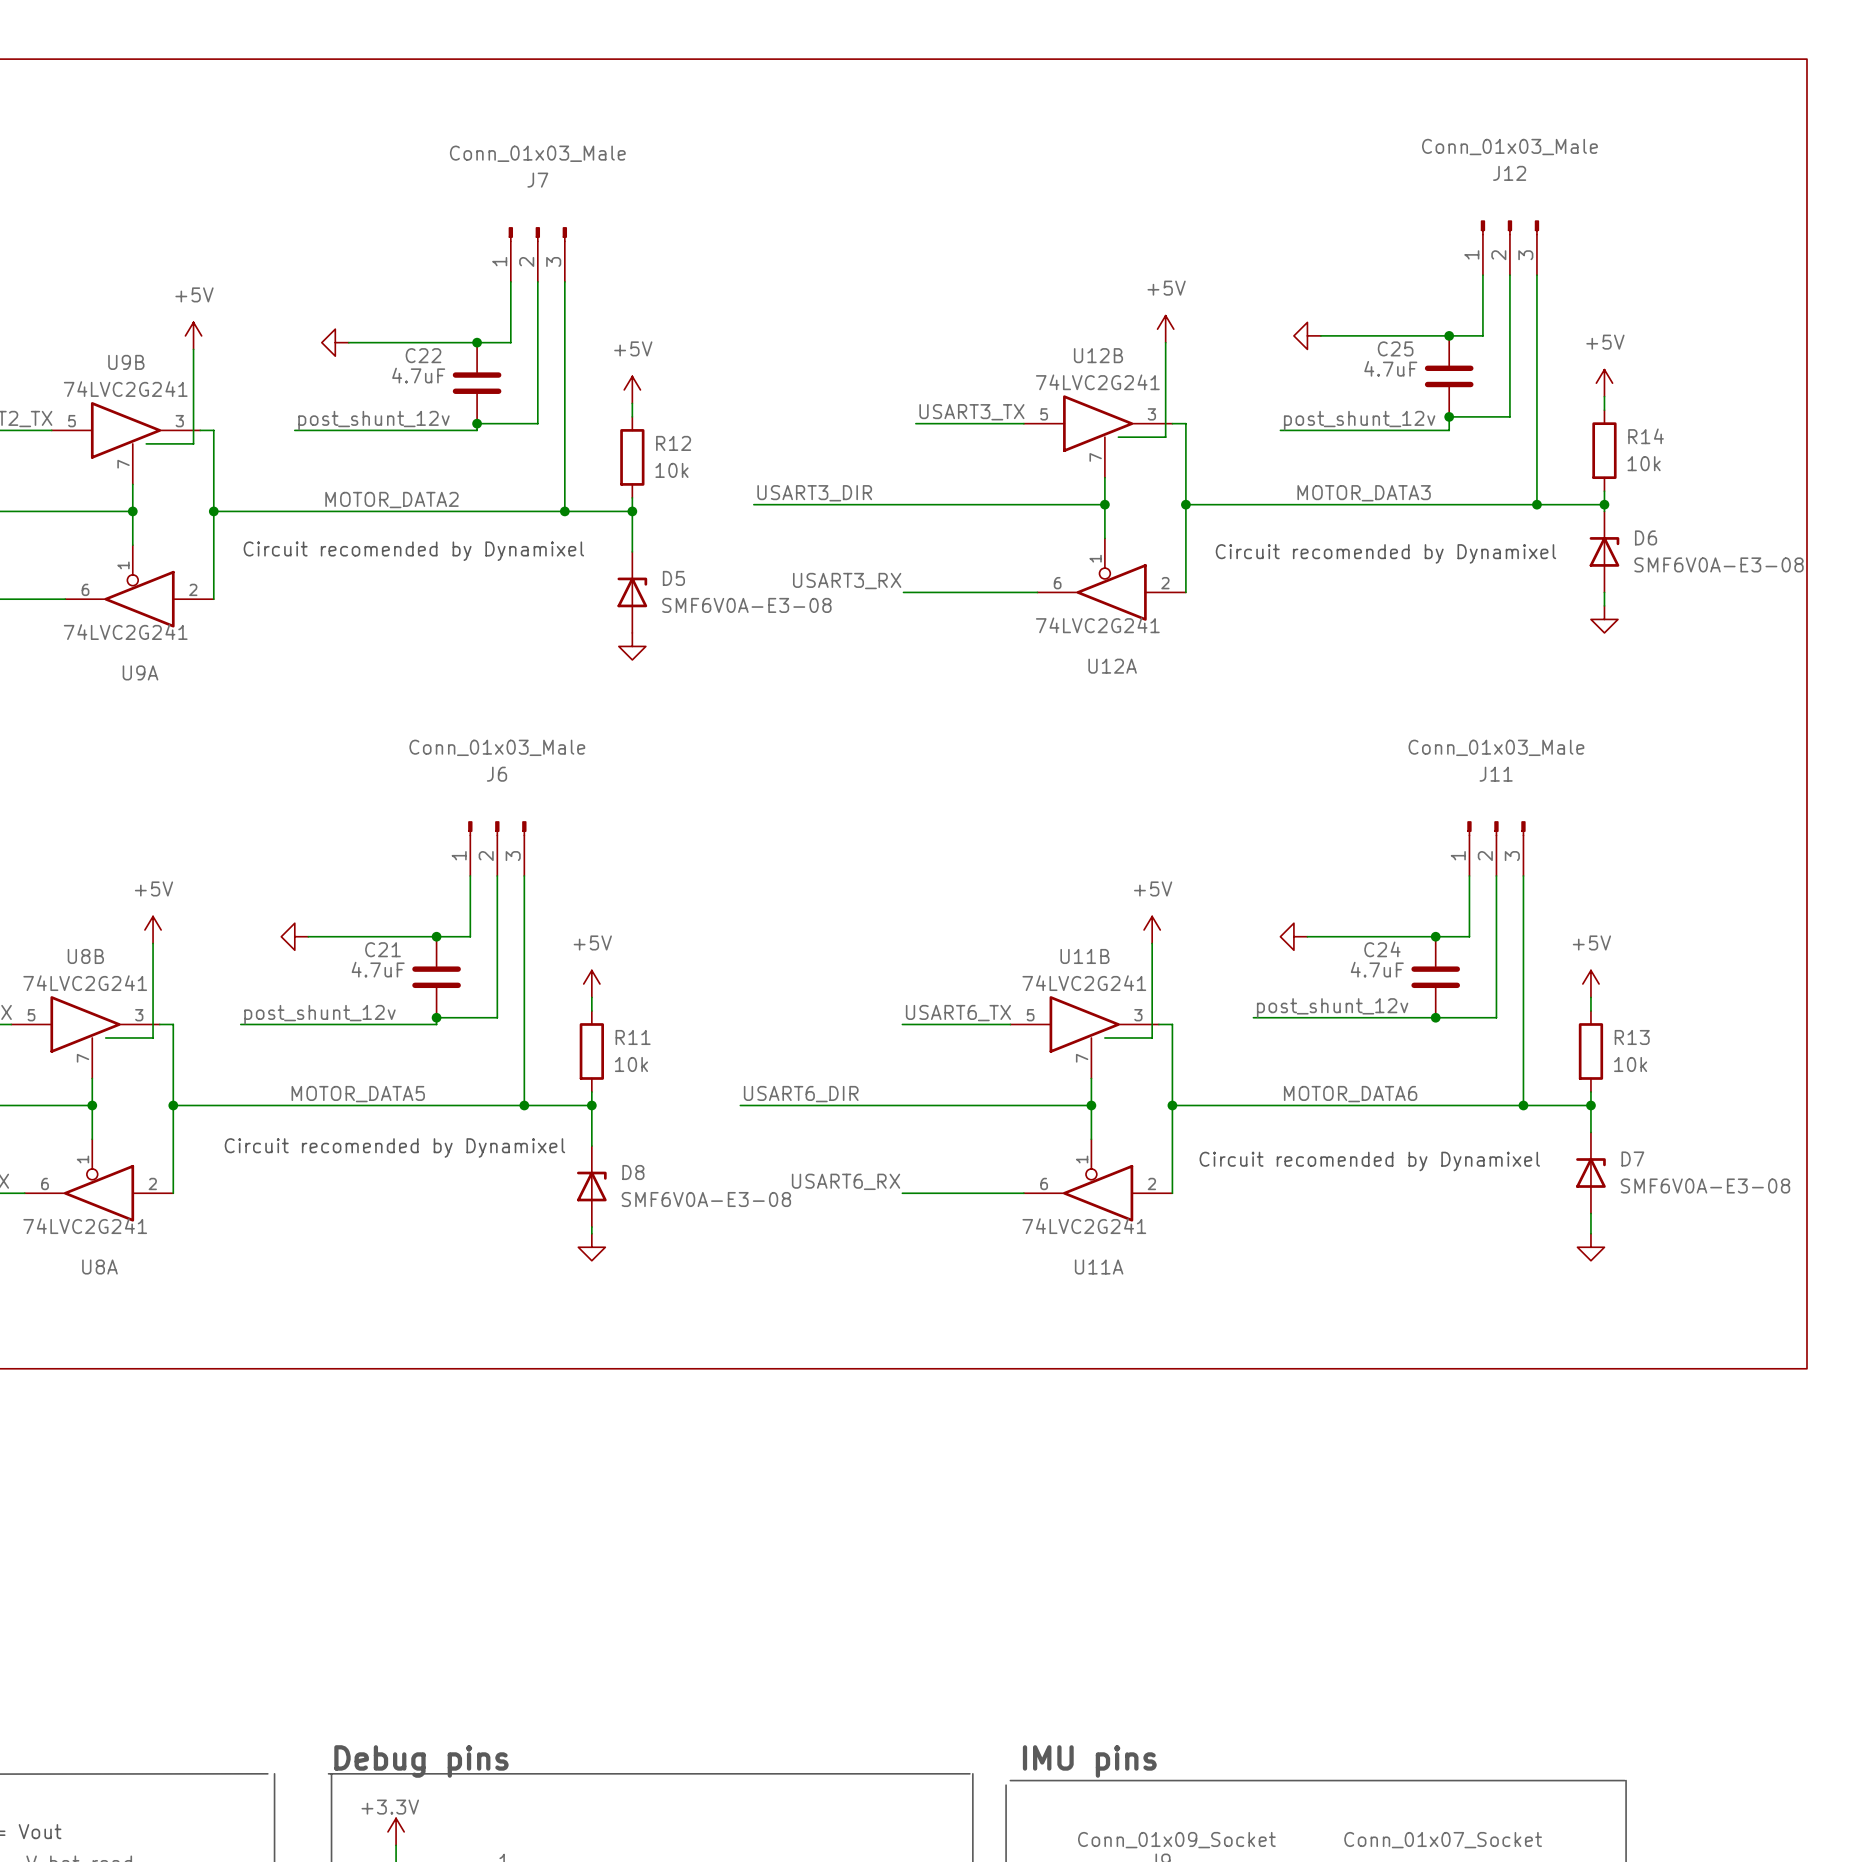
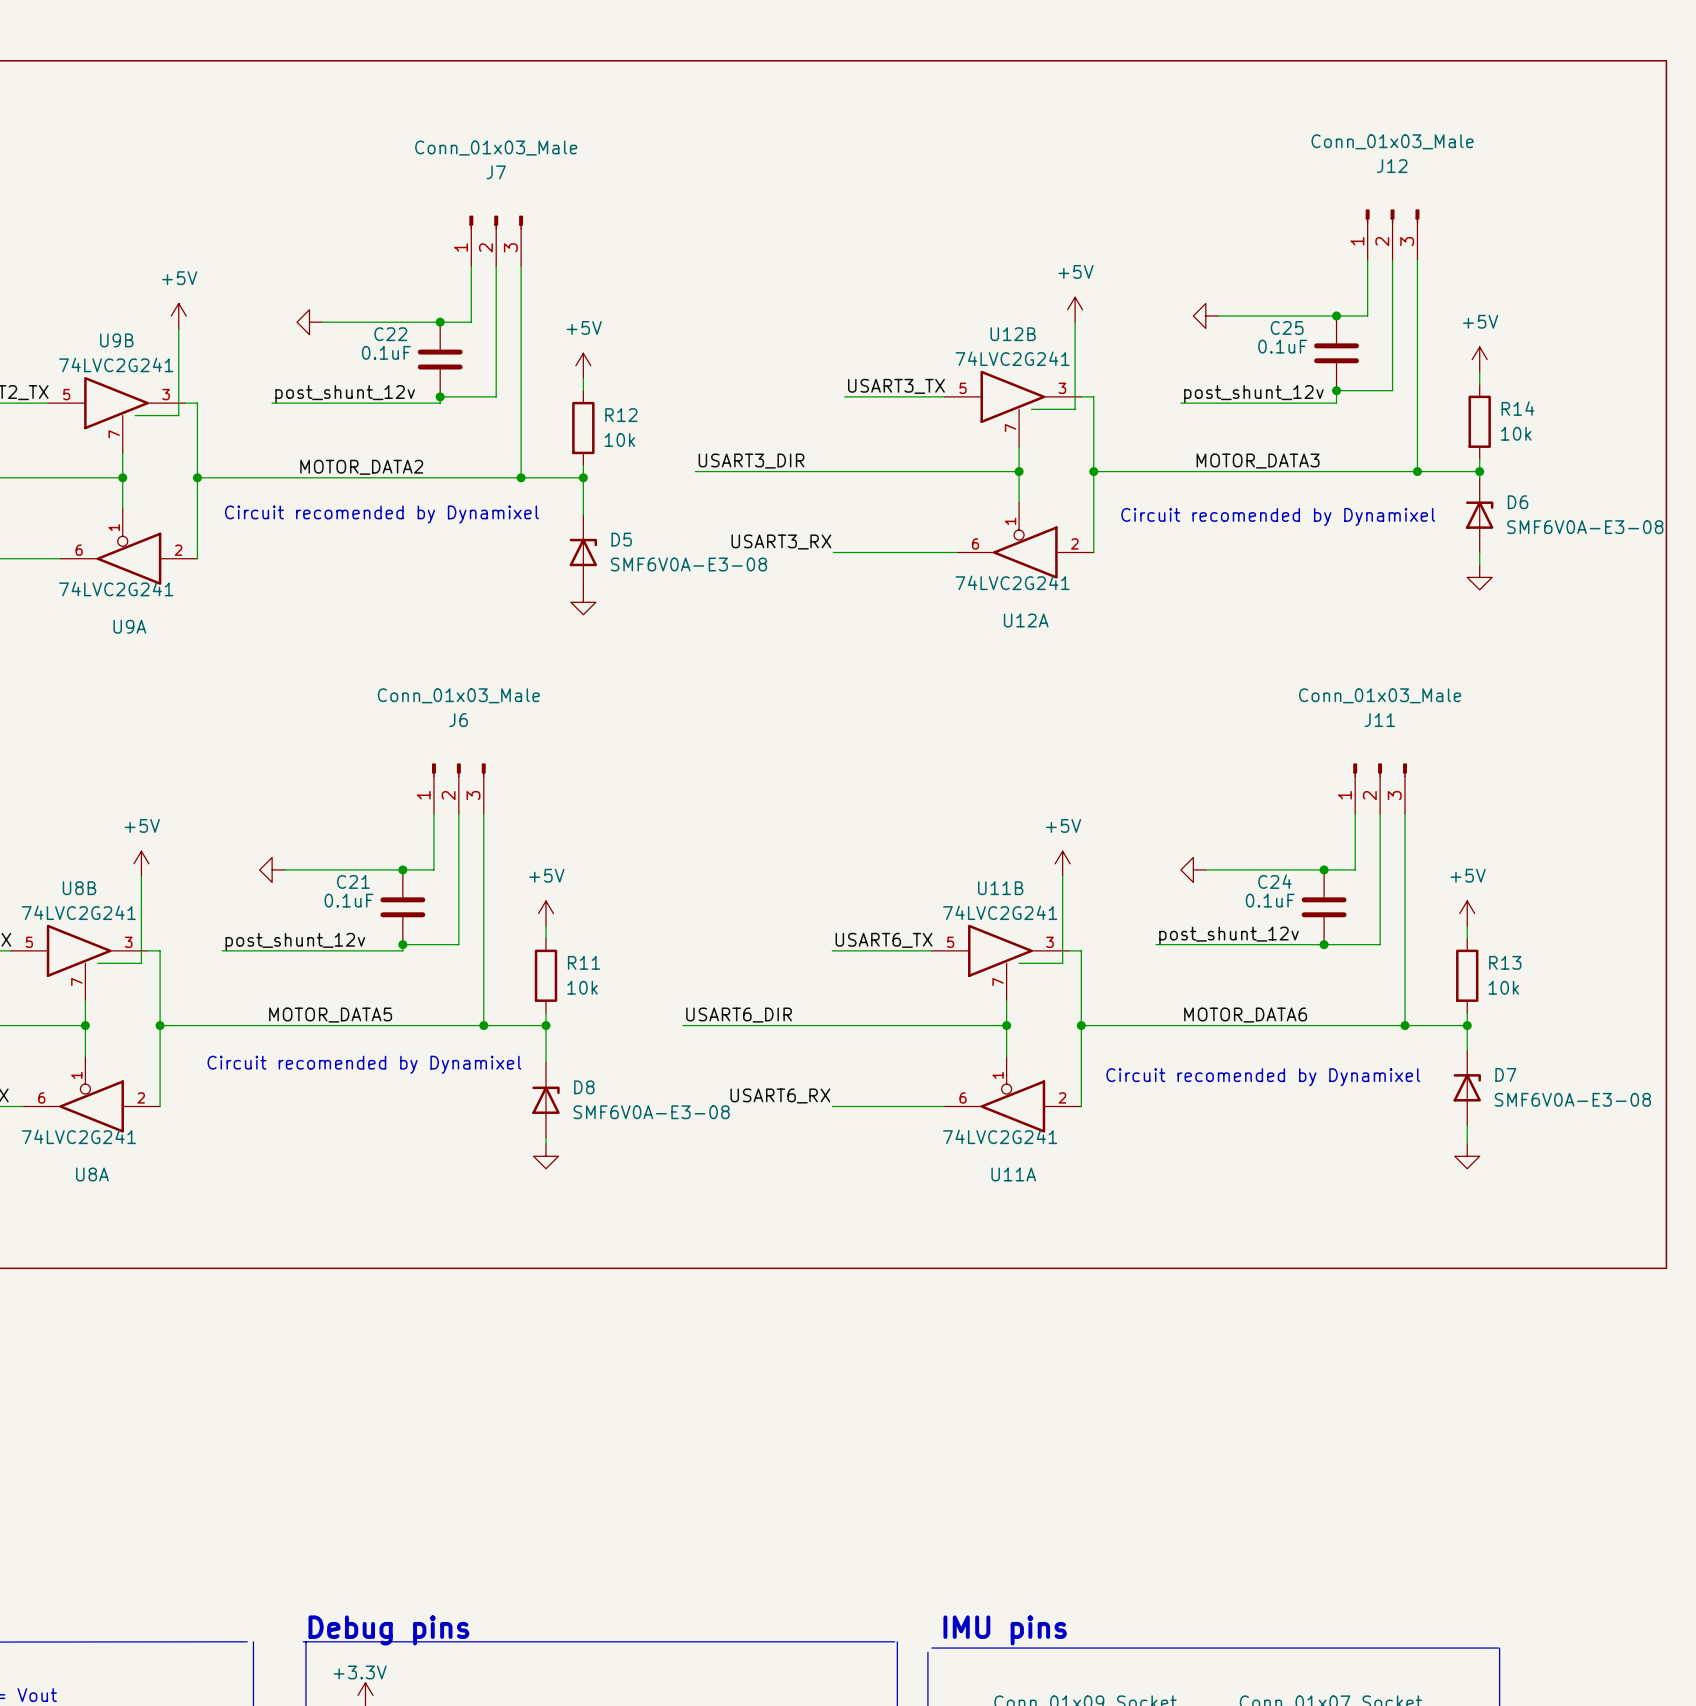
C25 value: 4.7uF (1390, 368) -> 0.1uF (1282, 346)
C22 value: 4.7uF (418, 375) -> 0.1uF (386, 352)
C21 value: 4.7uF (378, 969) -> 0.1uF (348, 900)
C24 value: 4.7uF (1377, 969) -> 0.1uF (1270, 900)

